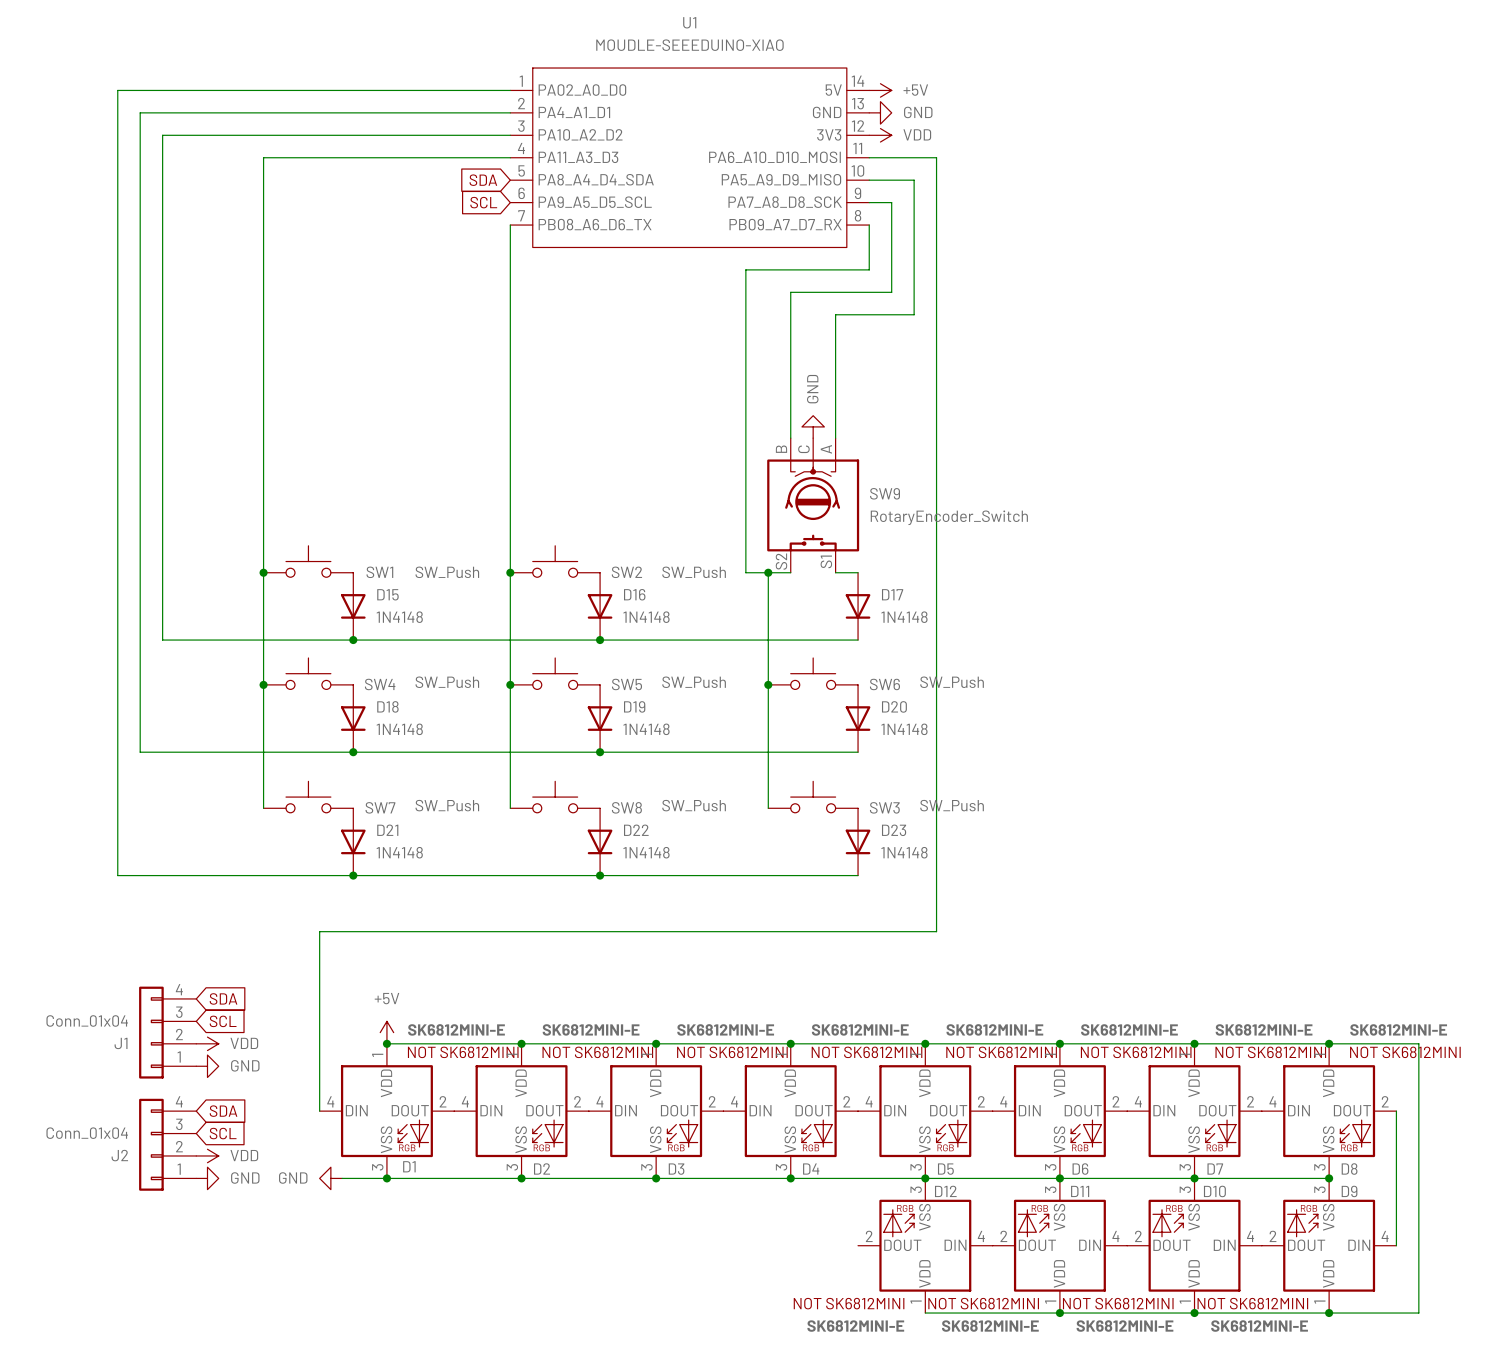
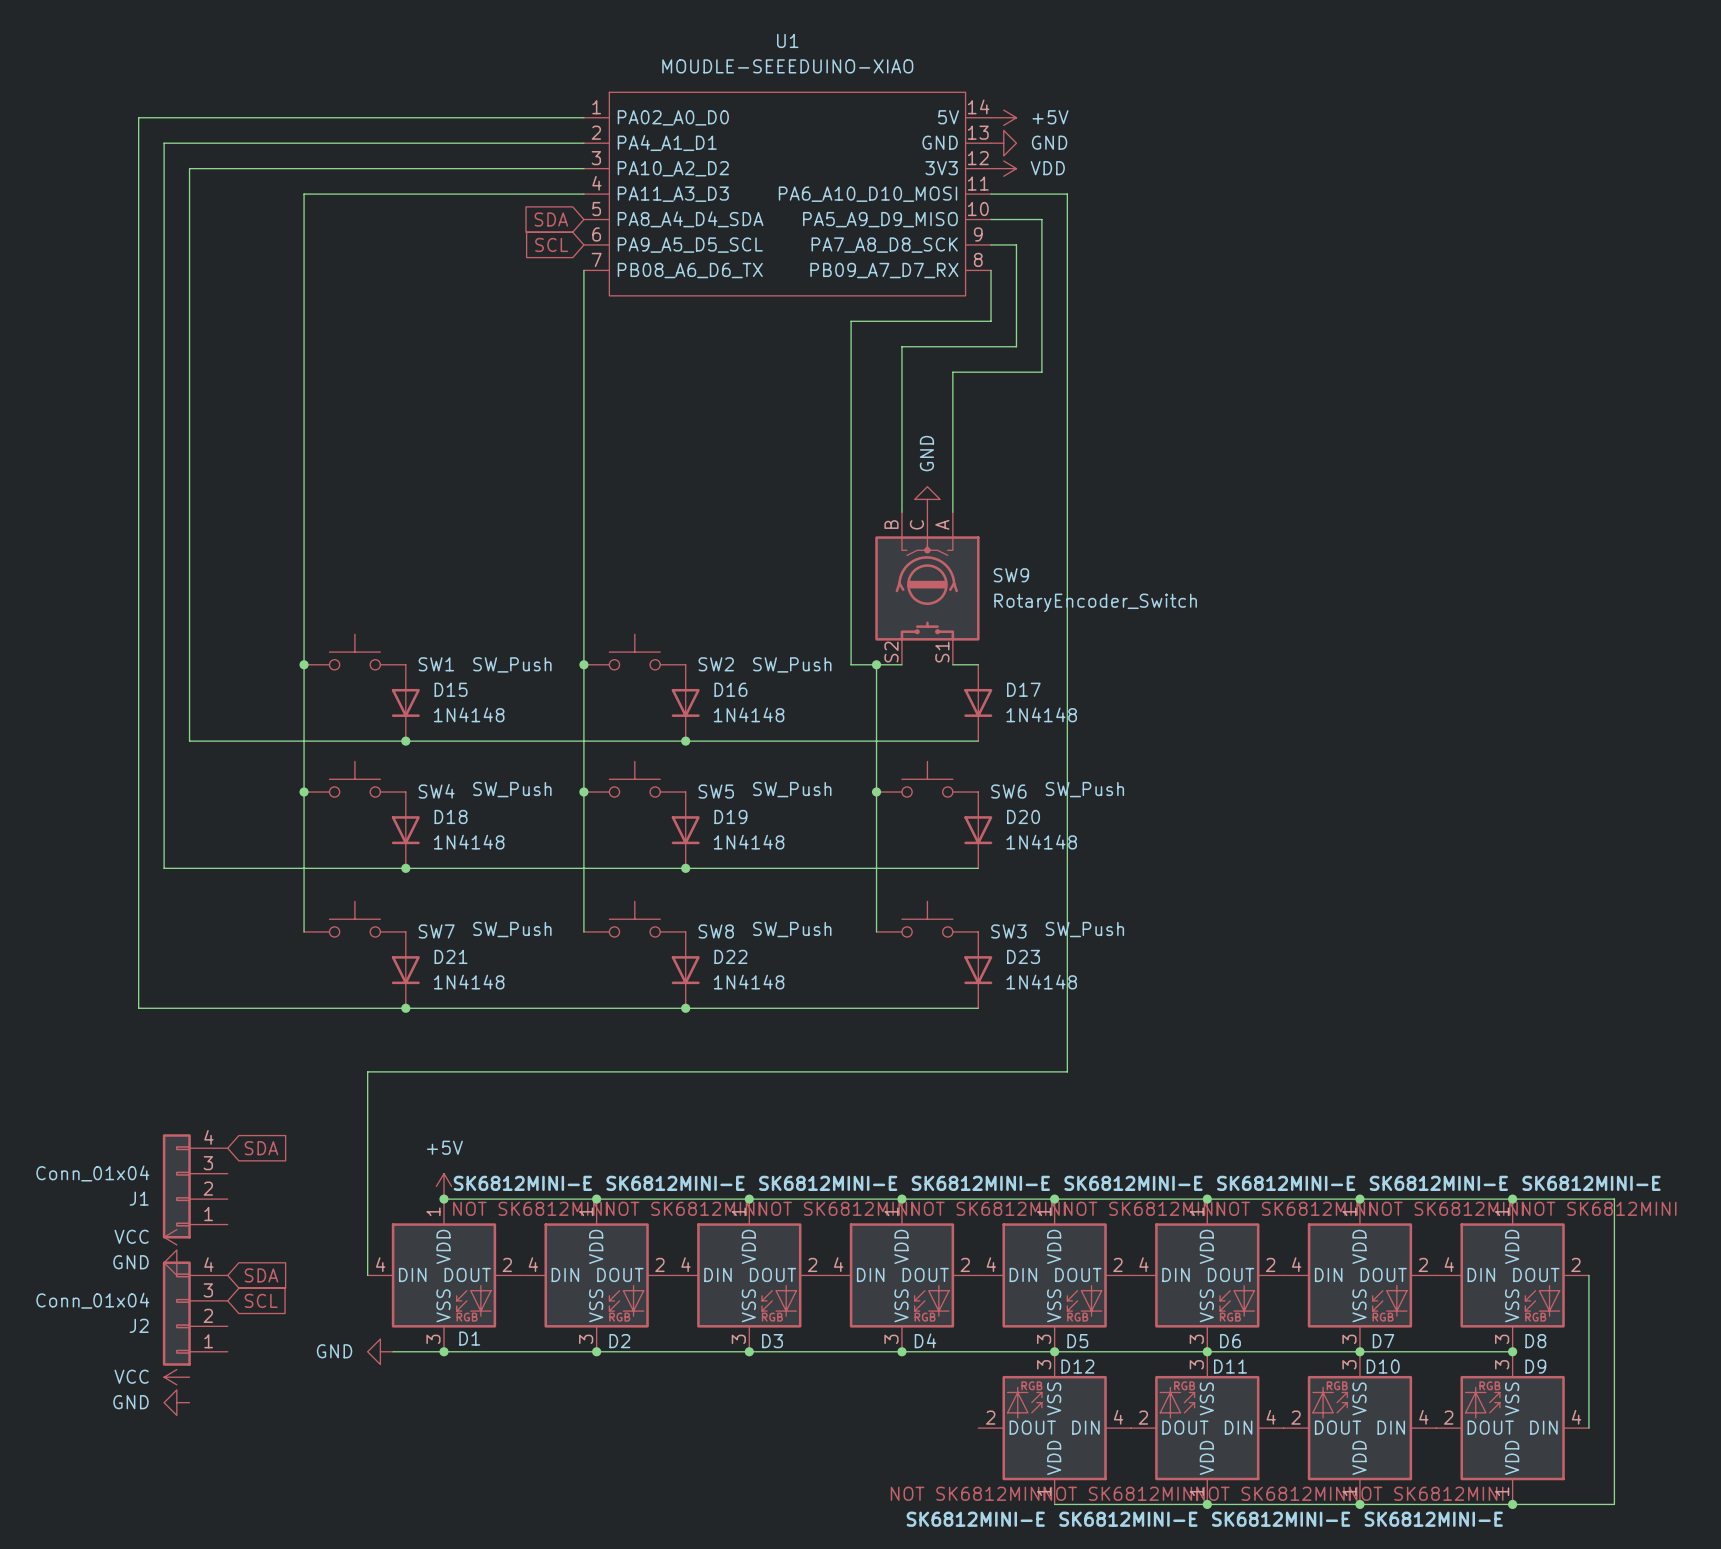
global label: SCL (223, 1021) -> none
power symbol: VDD (207, 1043) -> none
power symbol: GND (207, 1066) -> none
power symbol: none -> VCC (176, 1237)
power symbol: none -> GND (176, 1262)
power symbol: VDD (207, 1155) -> none
power symbol: GND (207, 1178) -> none
power symbol: none -> VCC (176, 1377)
power symbol: none -> GND (176, 1402)

